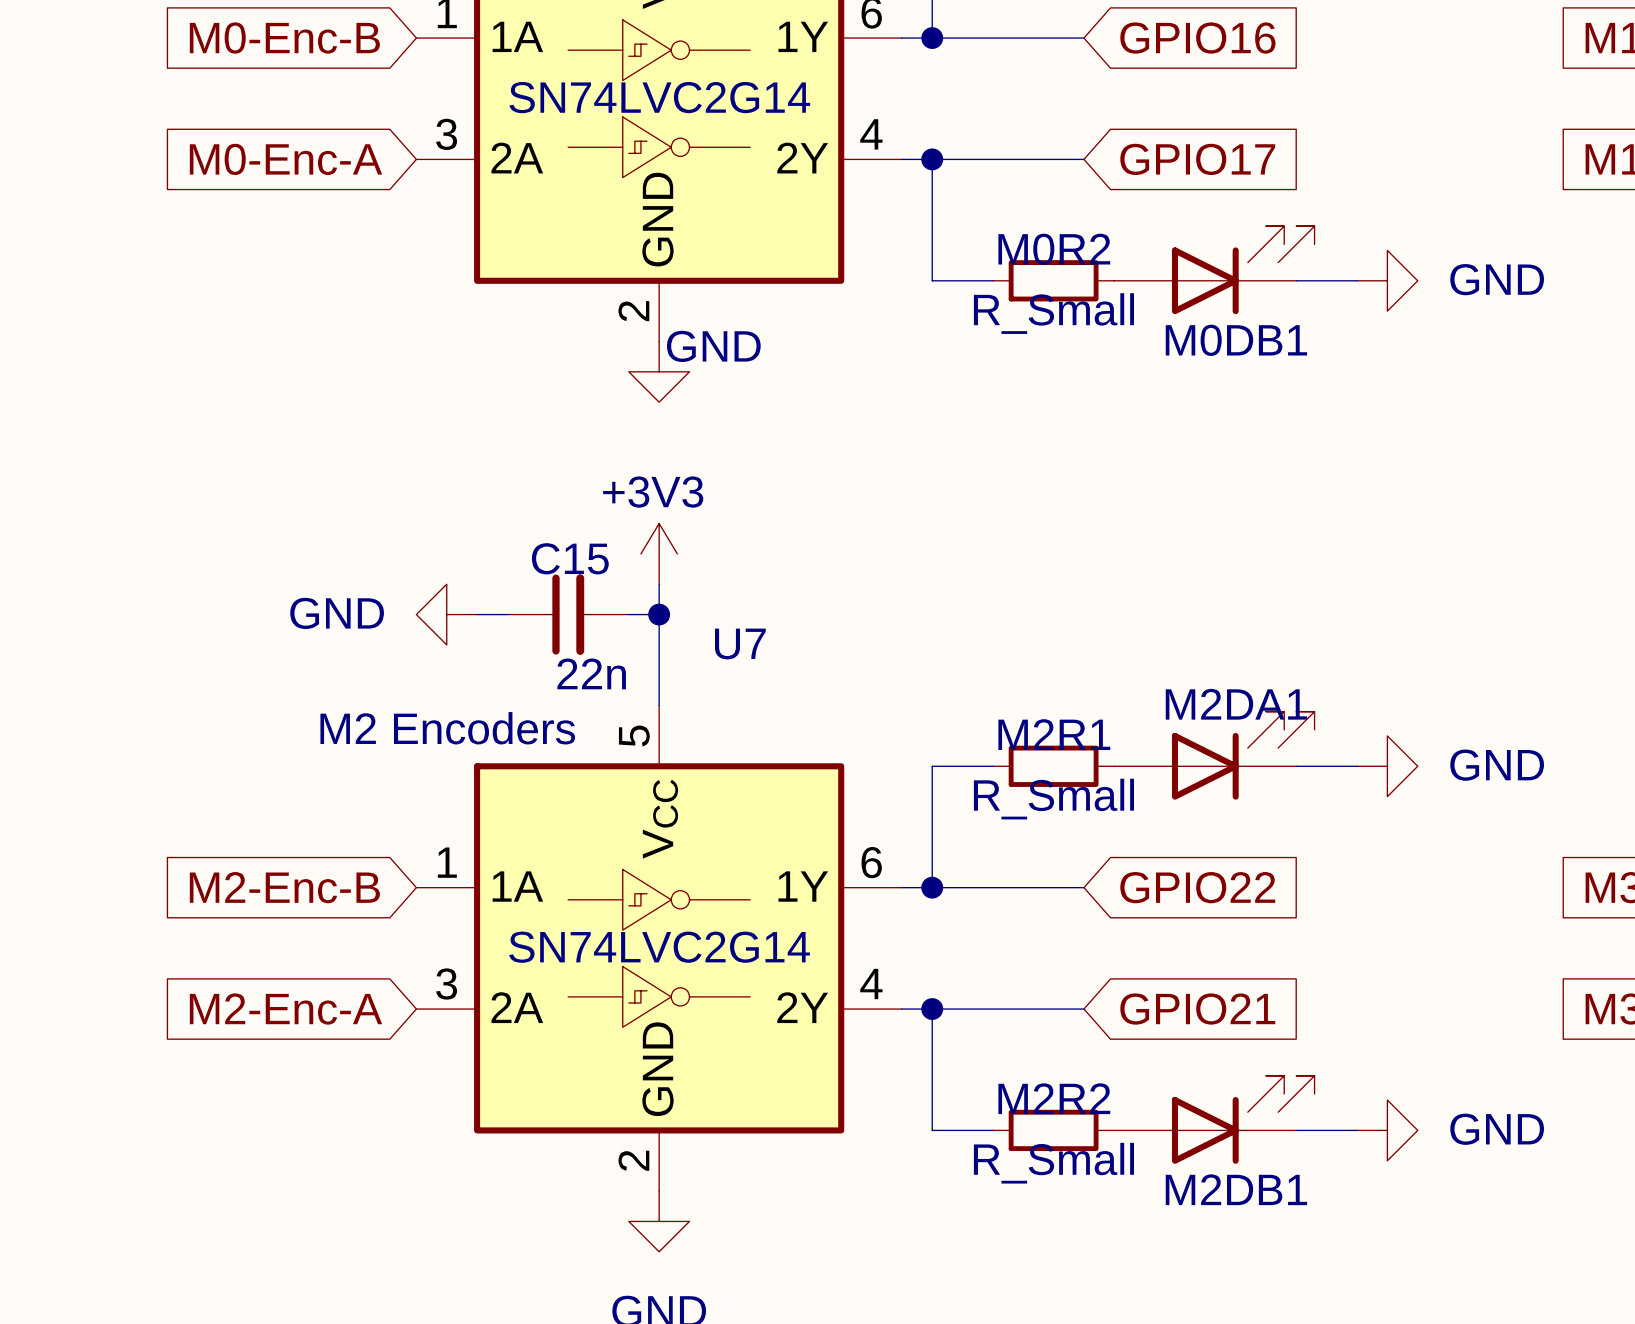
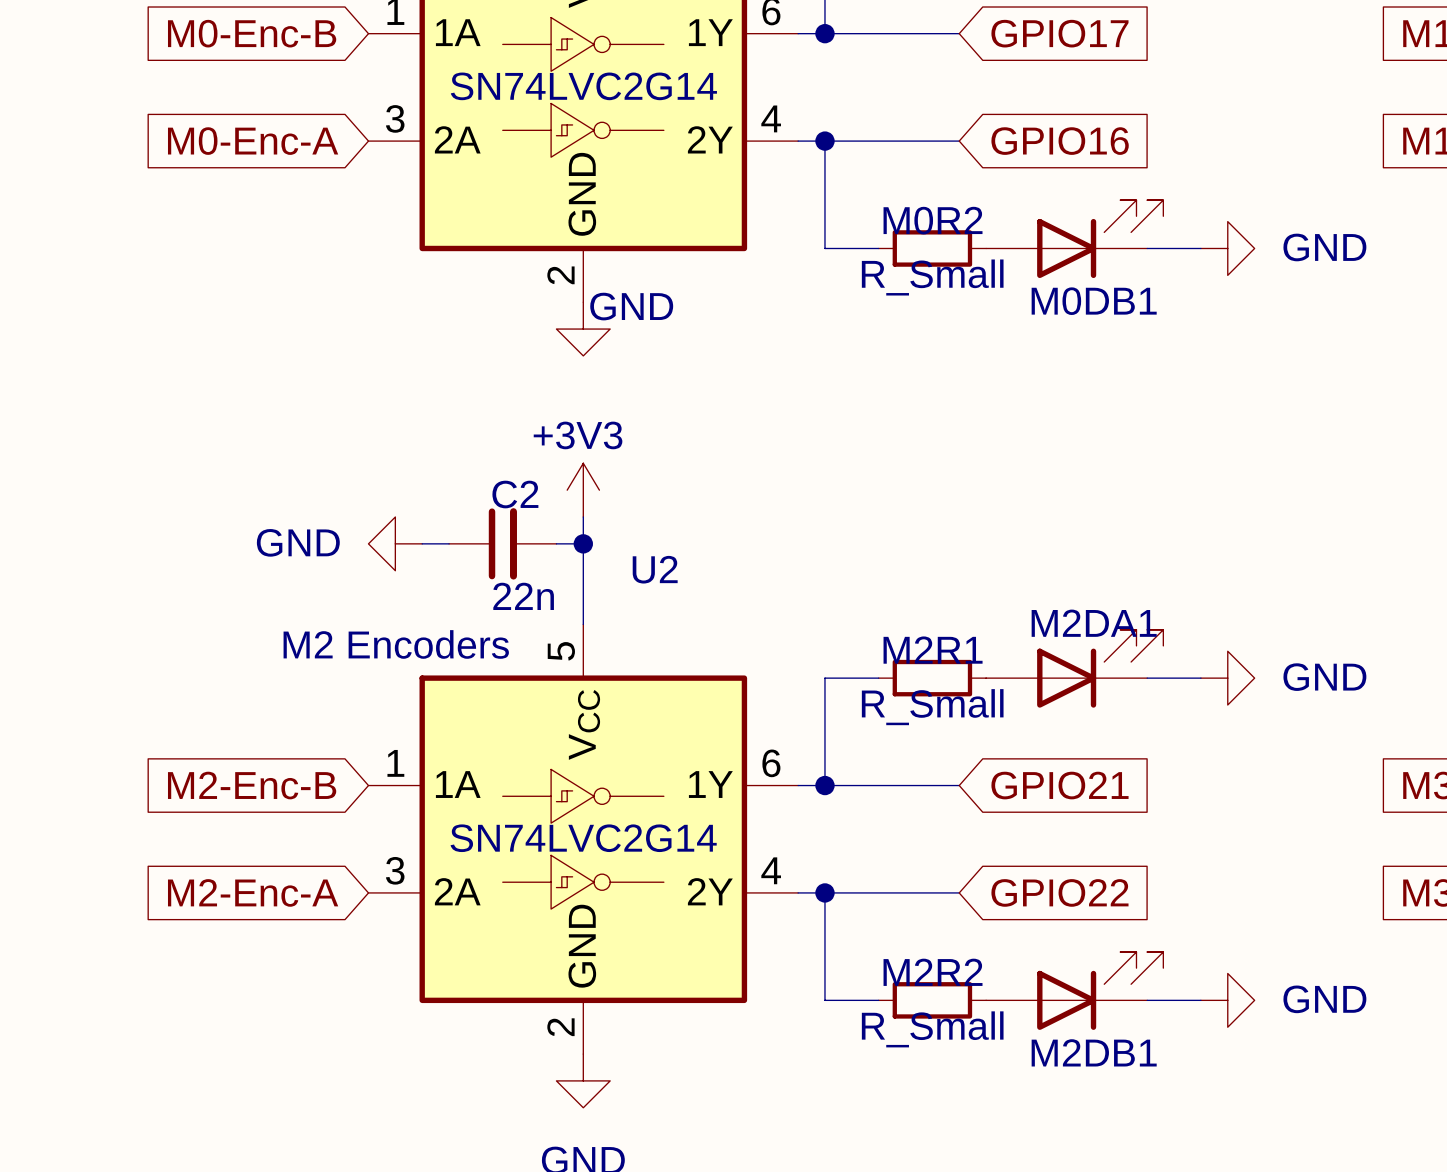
global label: GPIO16 (1197, 38) -> GPIO17 (1059, 33)
global label: GPIO17 (1197, 159) -> GPIO16 (1060, 141)
C15 name: C15 (570, 558) -> C2 (515, 494)
U7 name: U7 (740, 644) -> U2 (655, 569)
global label: GPIO22 (1197, 887) -> GPIO21 (1059, 785)
global label: GPIO21 (1197, 1009) -> GPIO22 (1059, 892)

